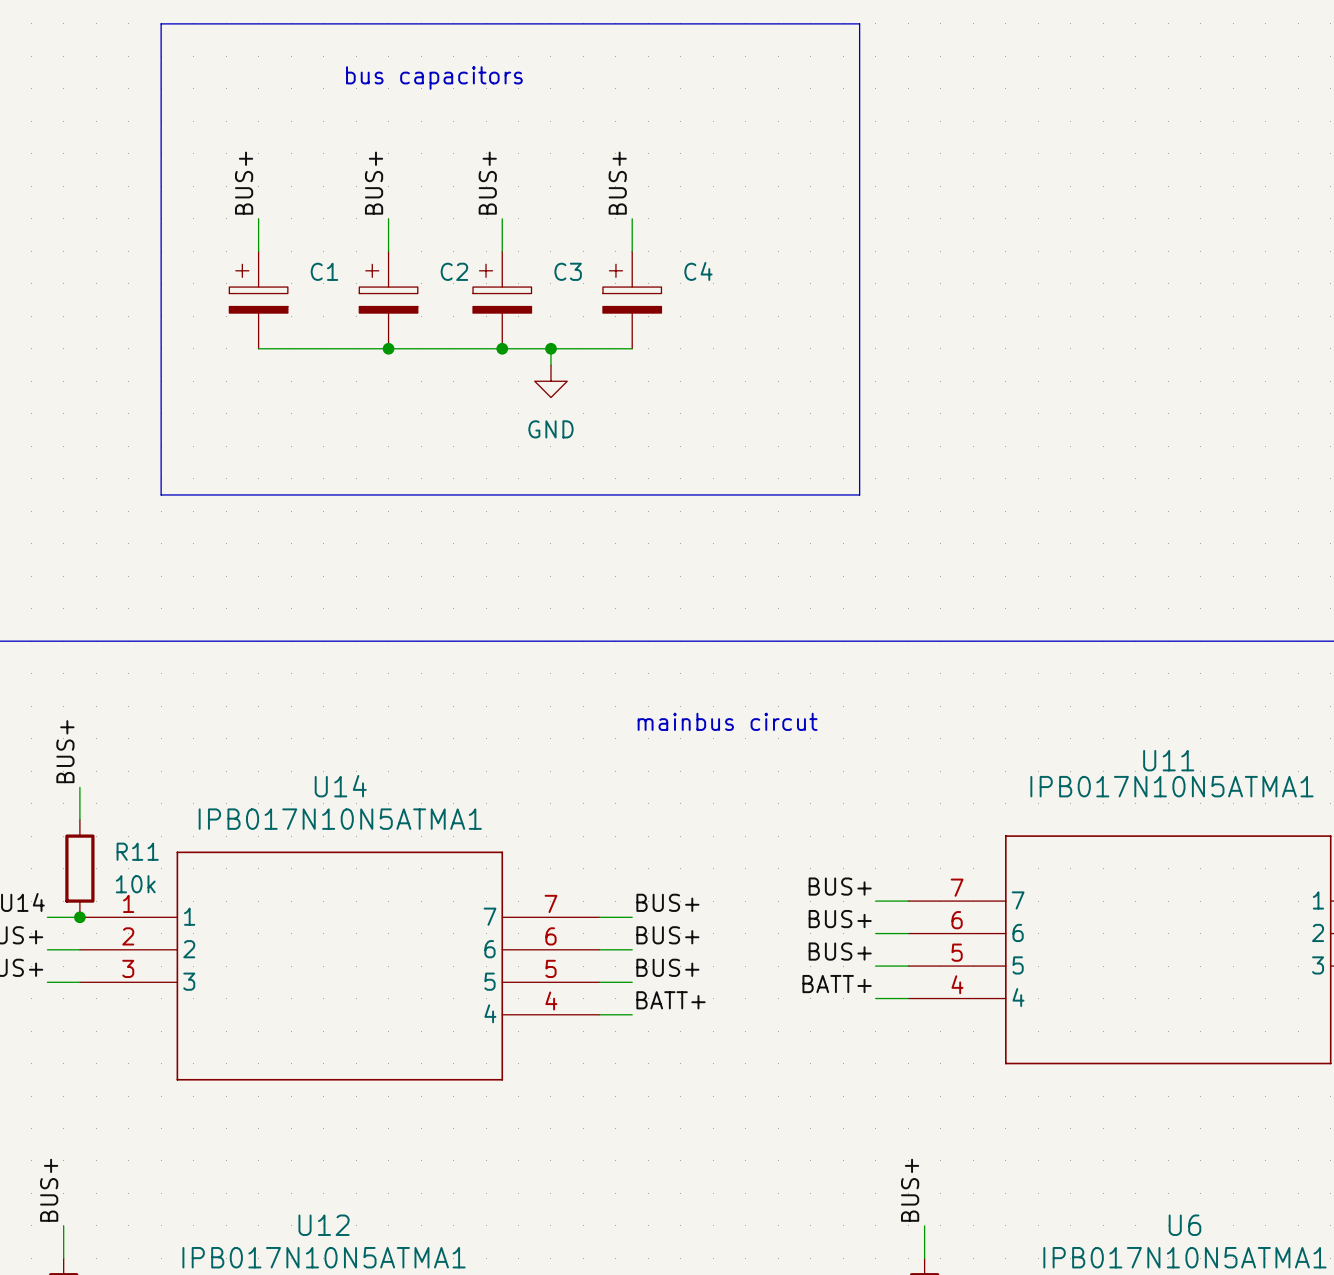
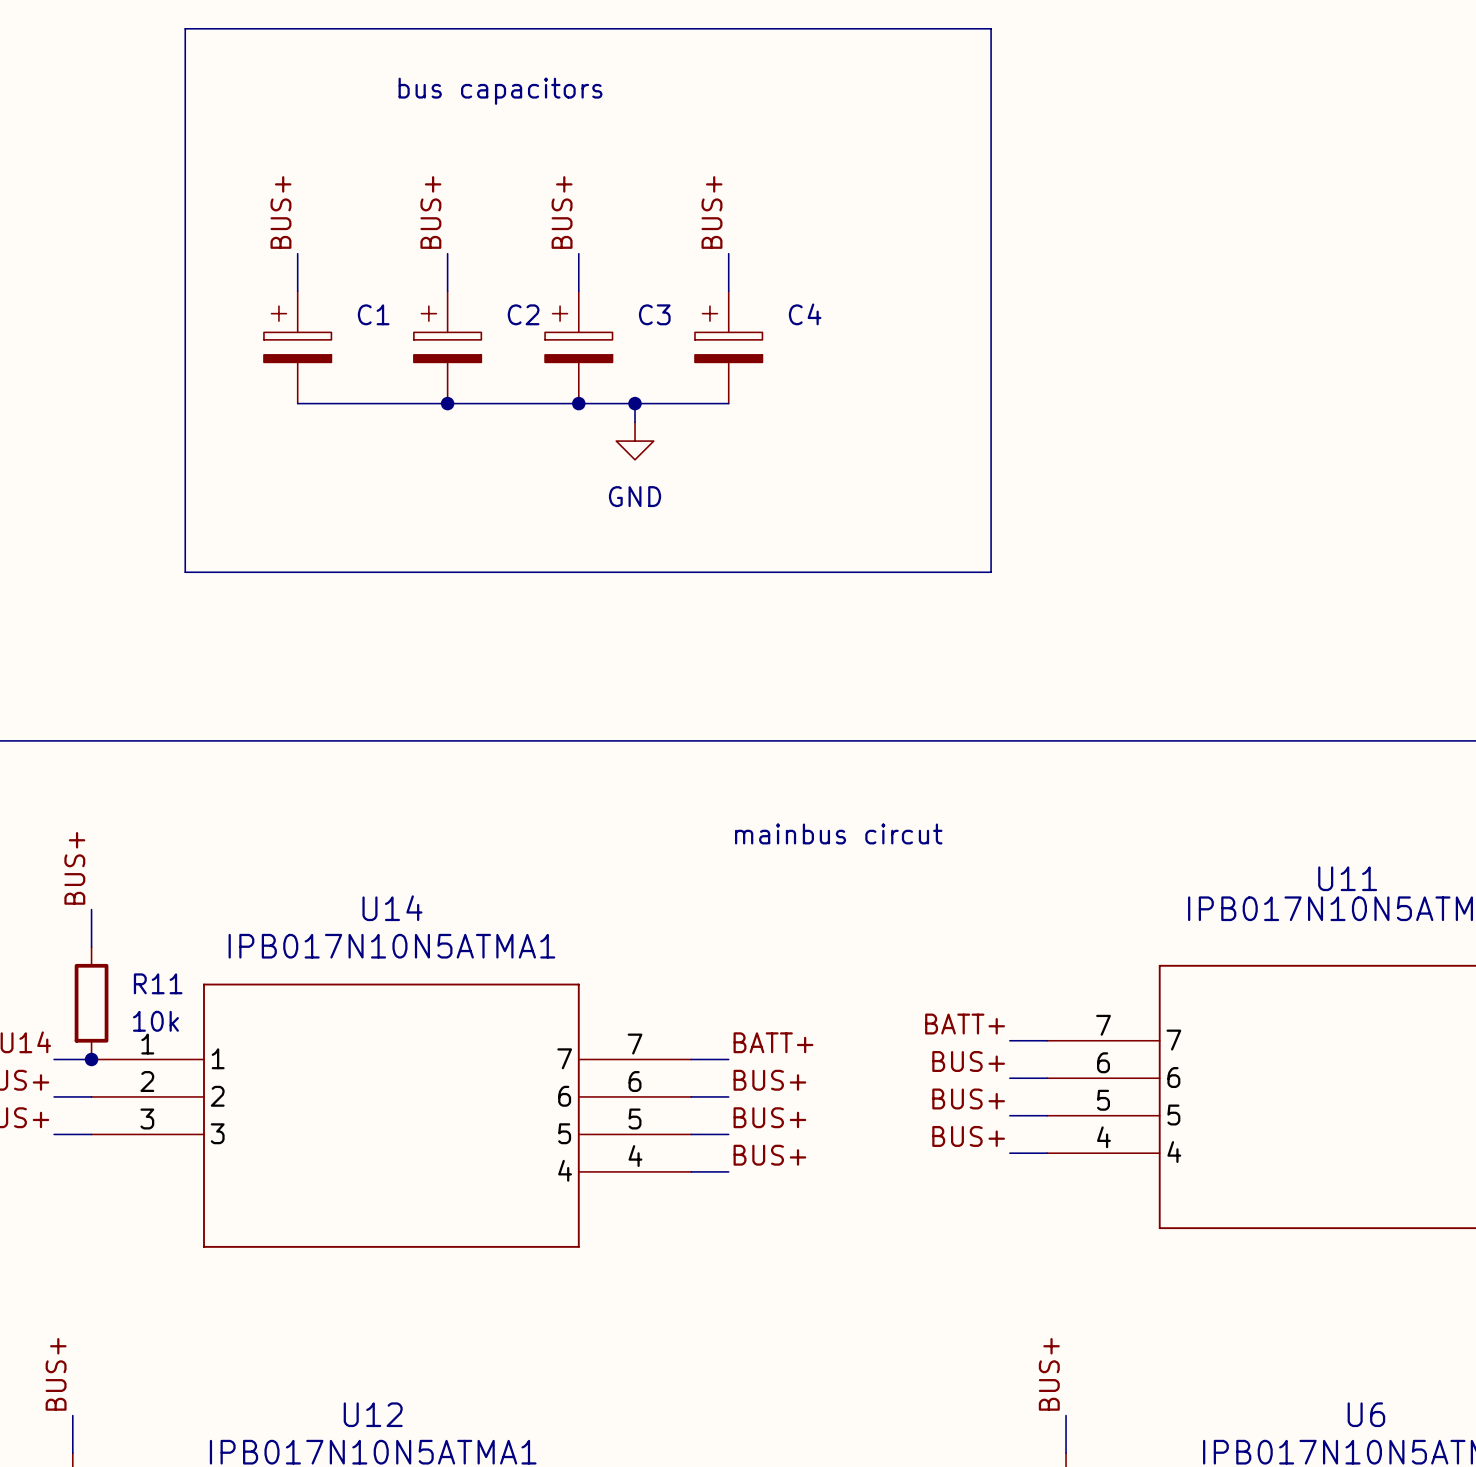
label: BUS+ (840, 886) -> BATT+ (965, 1024)
label: BUS+ (667, 902) -> BATT+ (773, 1042)
label: BATT+ (837, 984) -> BUS+ (968, 1136)
label: BATT+ (671, 1000) -> BUS+ (769, 1155)

